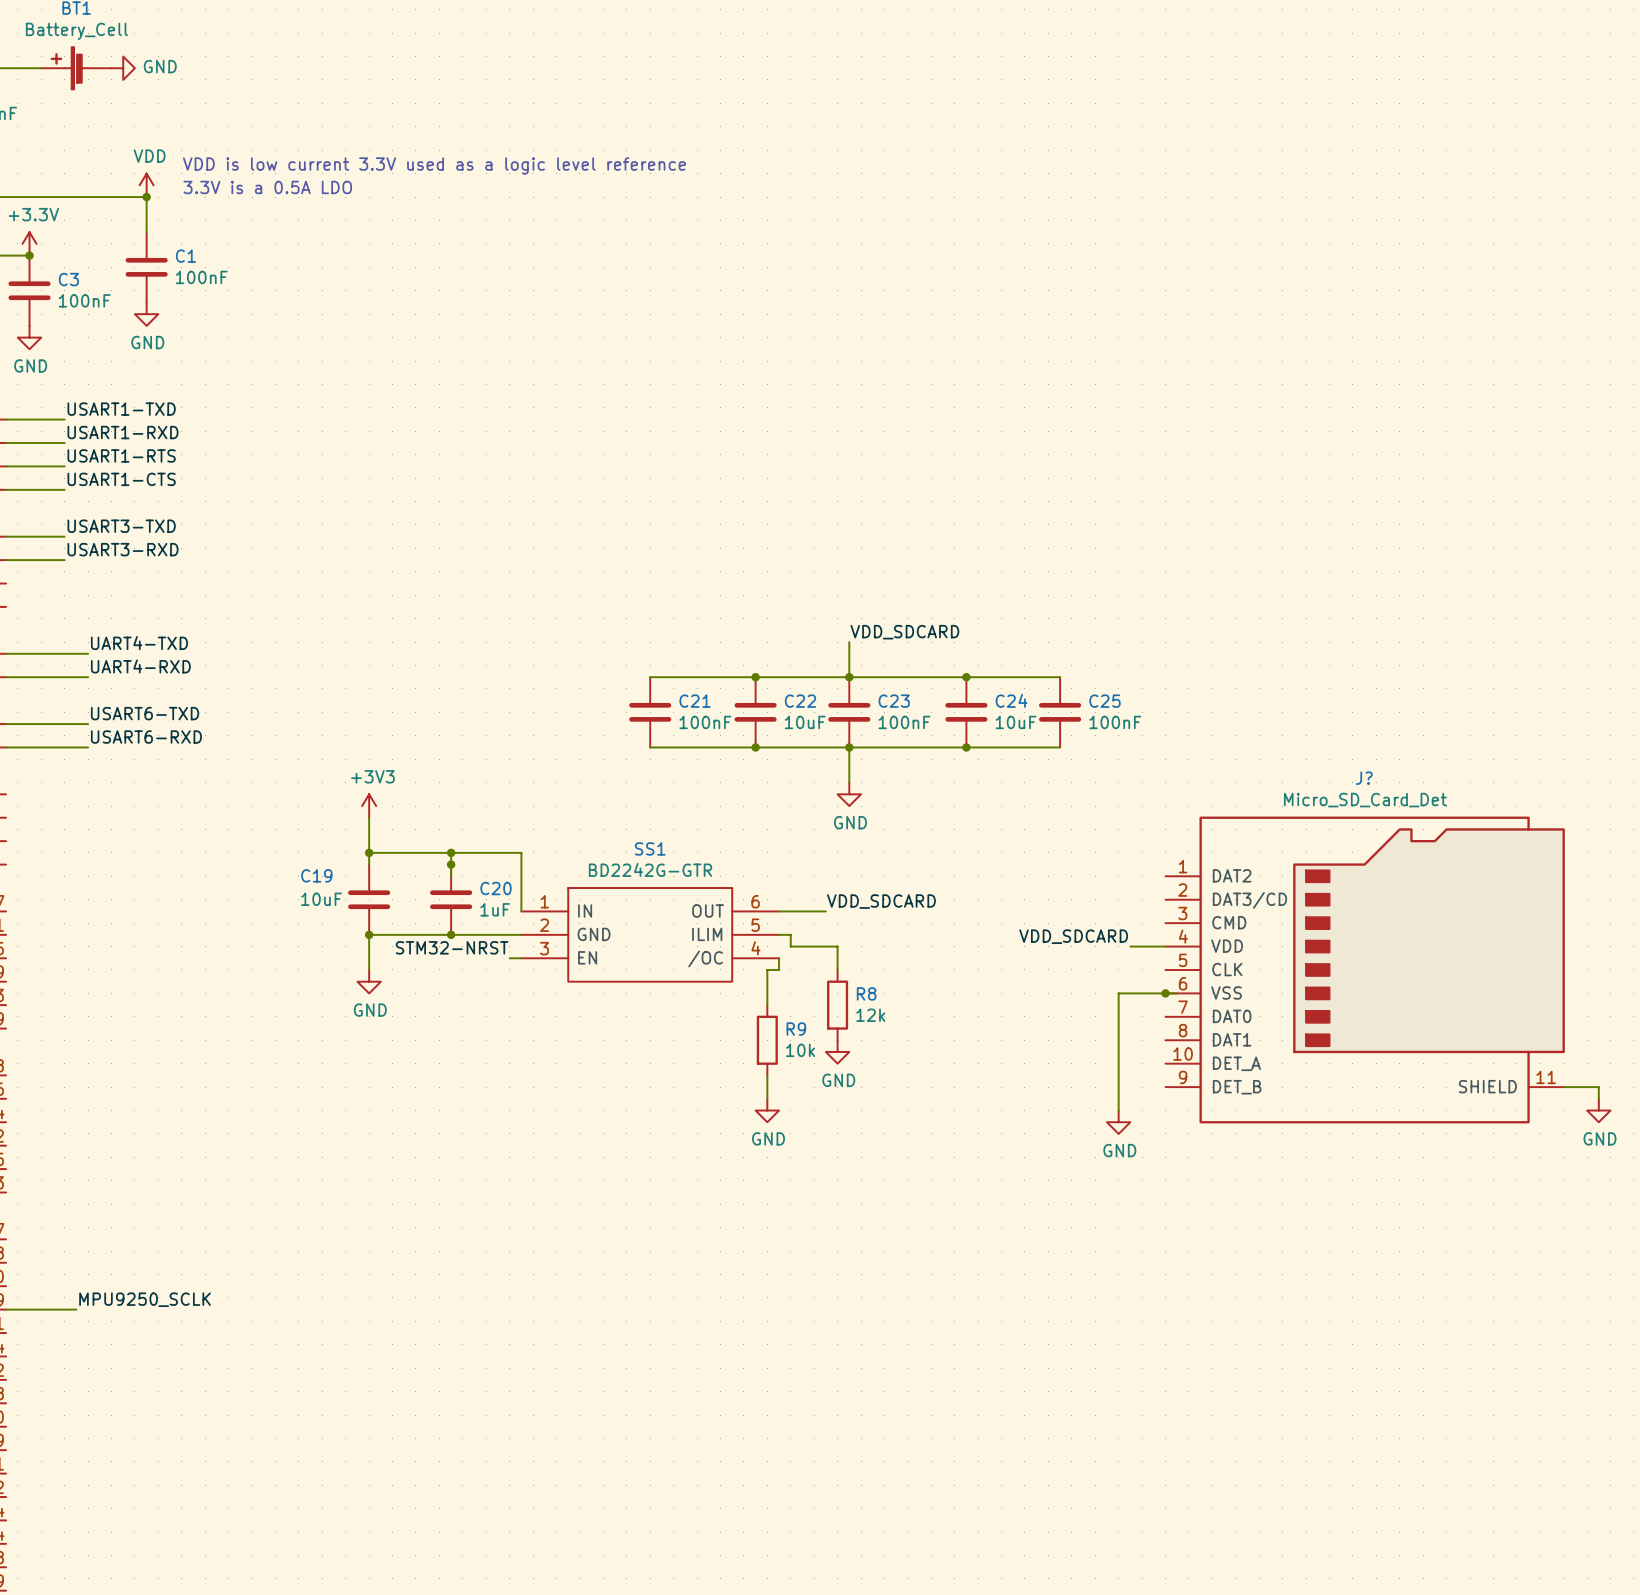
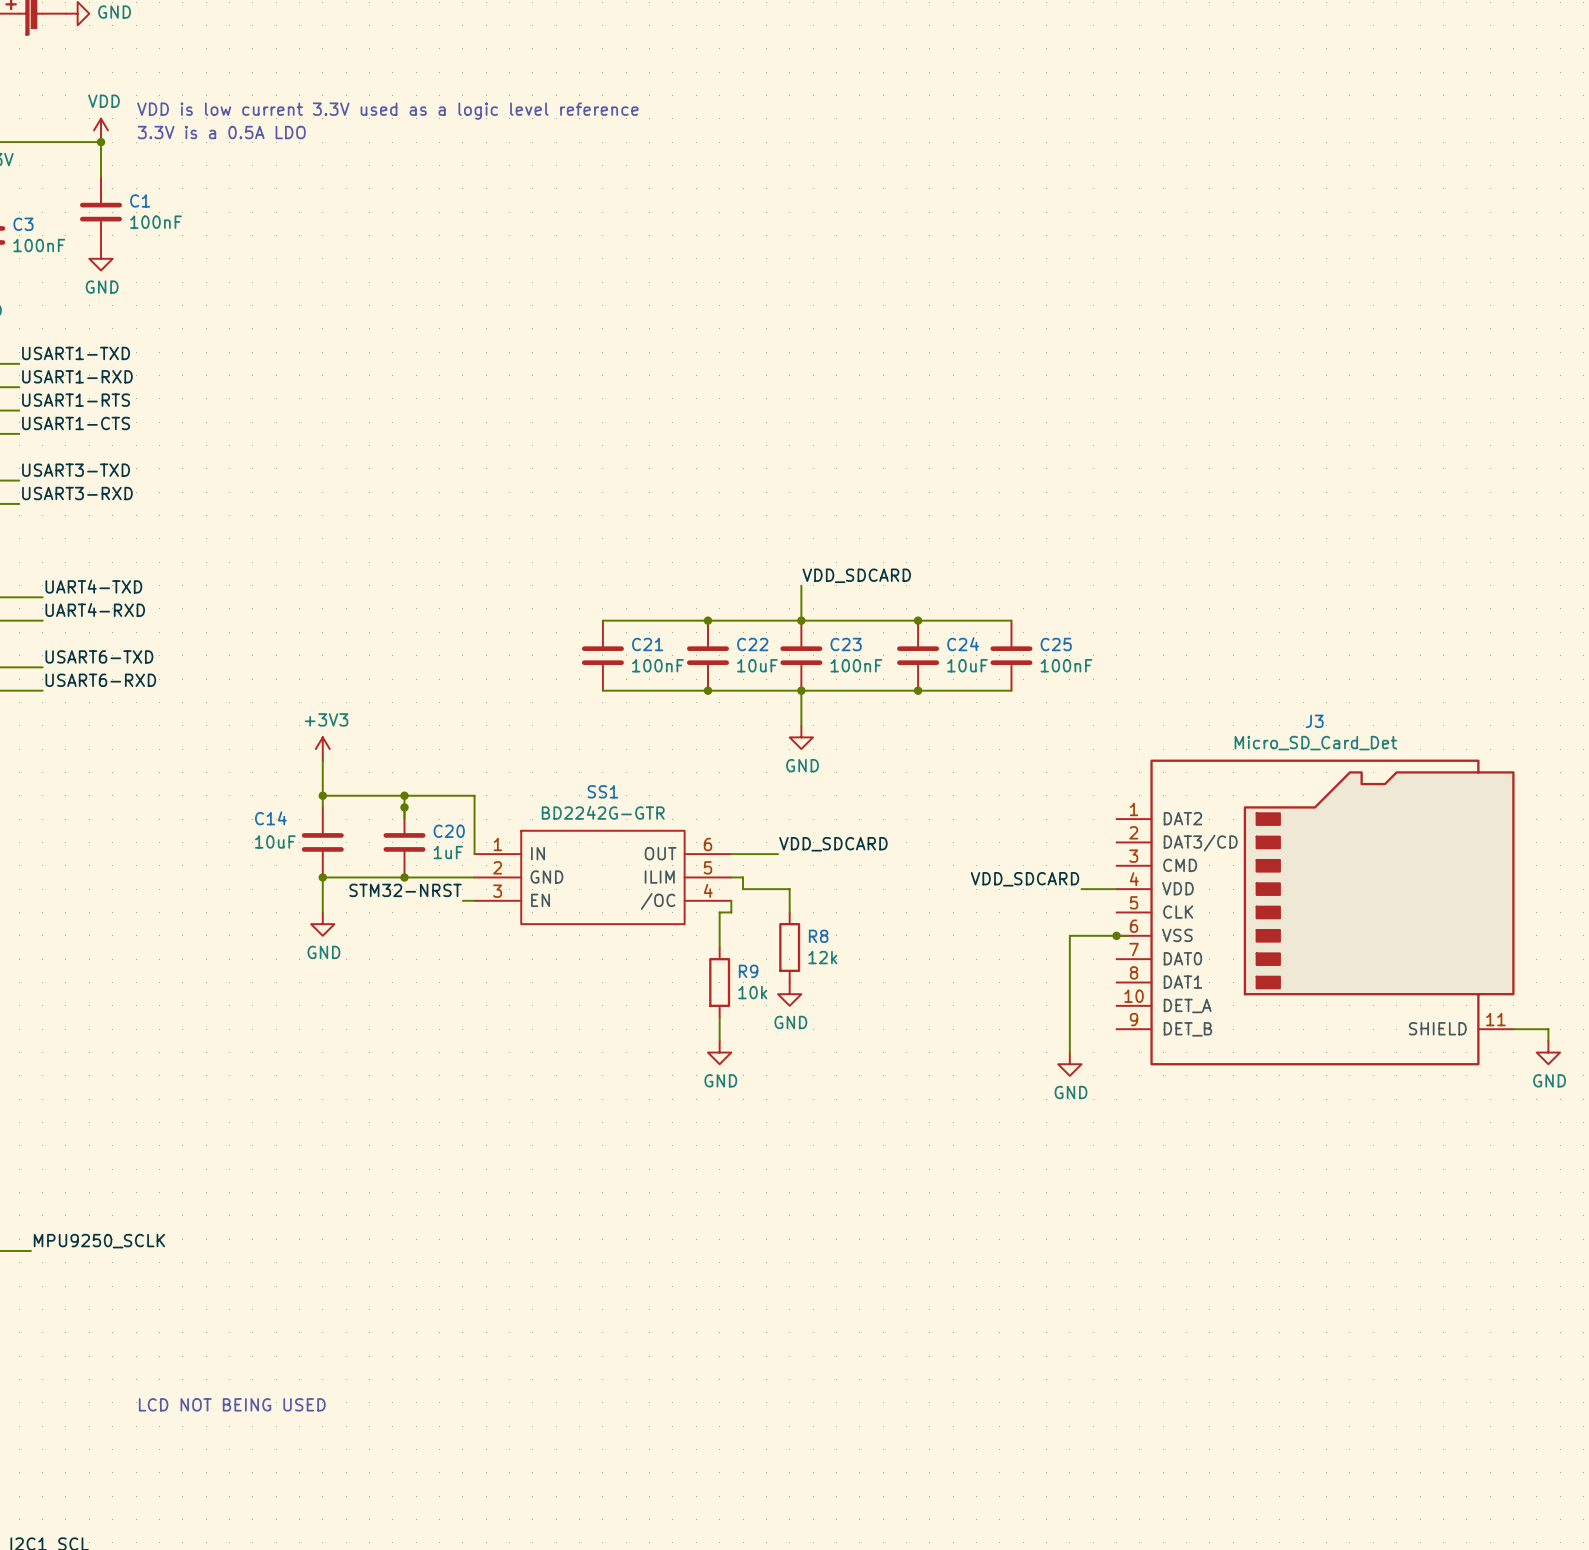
J? name: J? (1364, 778) -> J3 (1314, 721)
C19 name: C19 (316, 875) -> C14 (270, 818)
text: none -> LCD NOT BEING USED (232, 1404)

